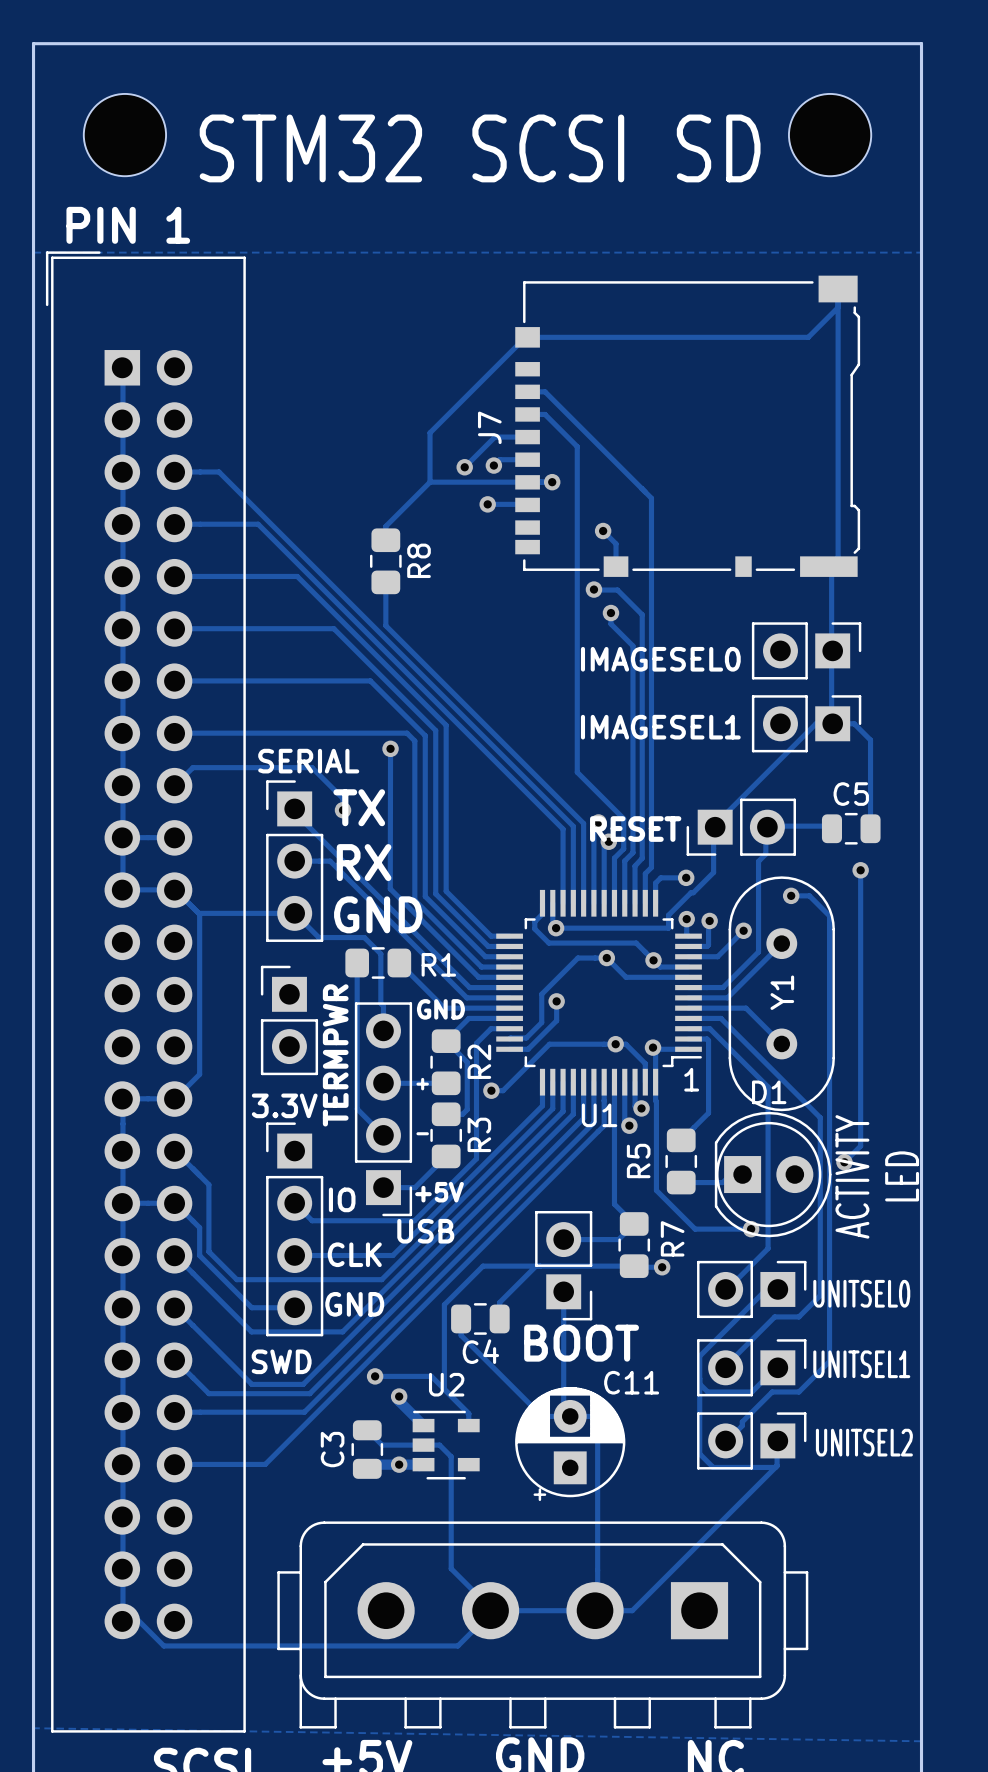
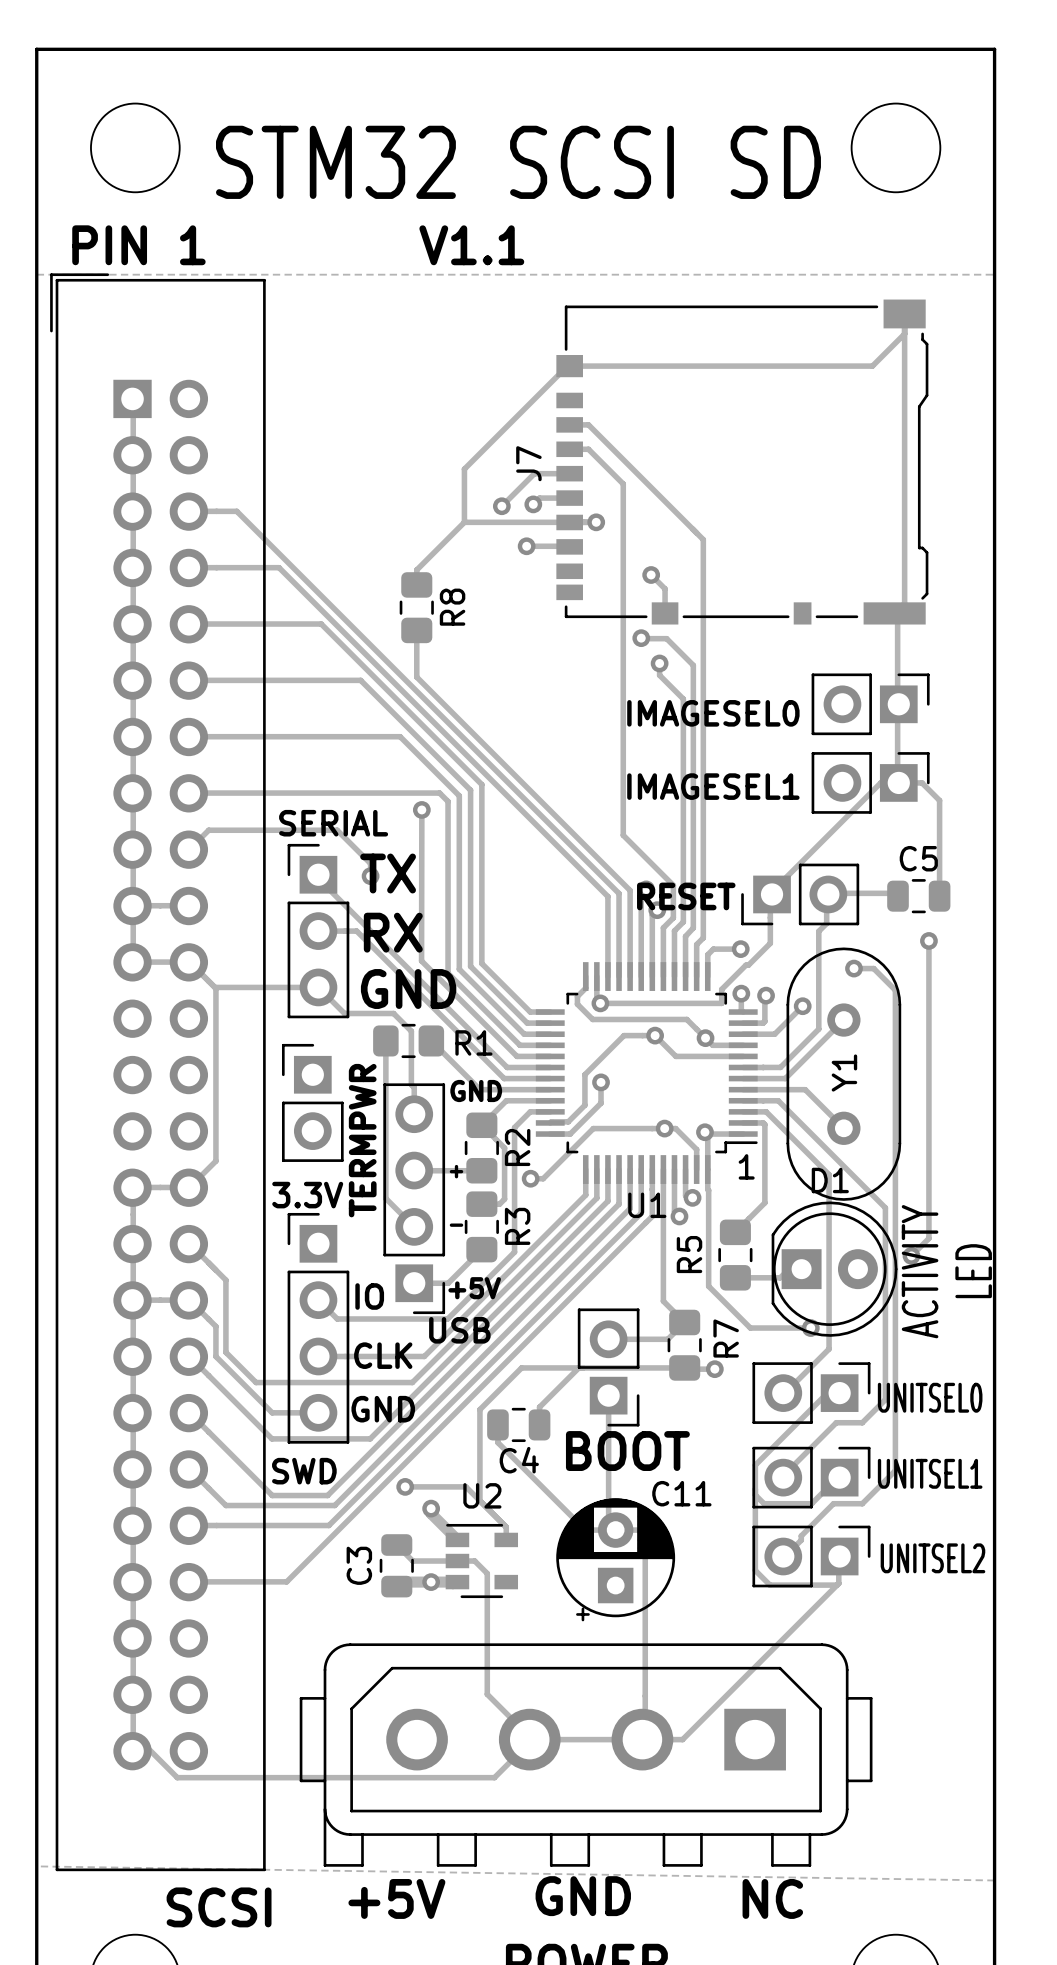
text: none -> V1.1 (471, 245)

